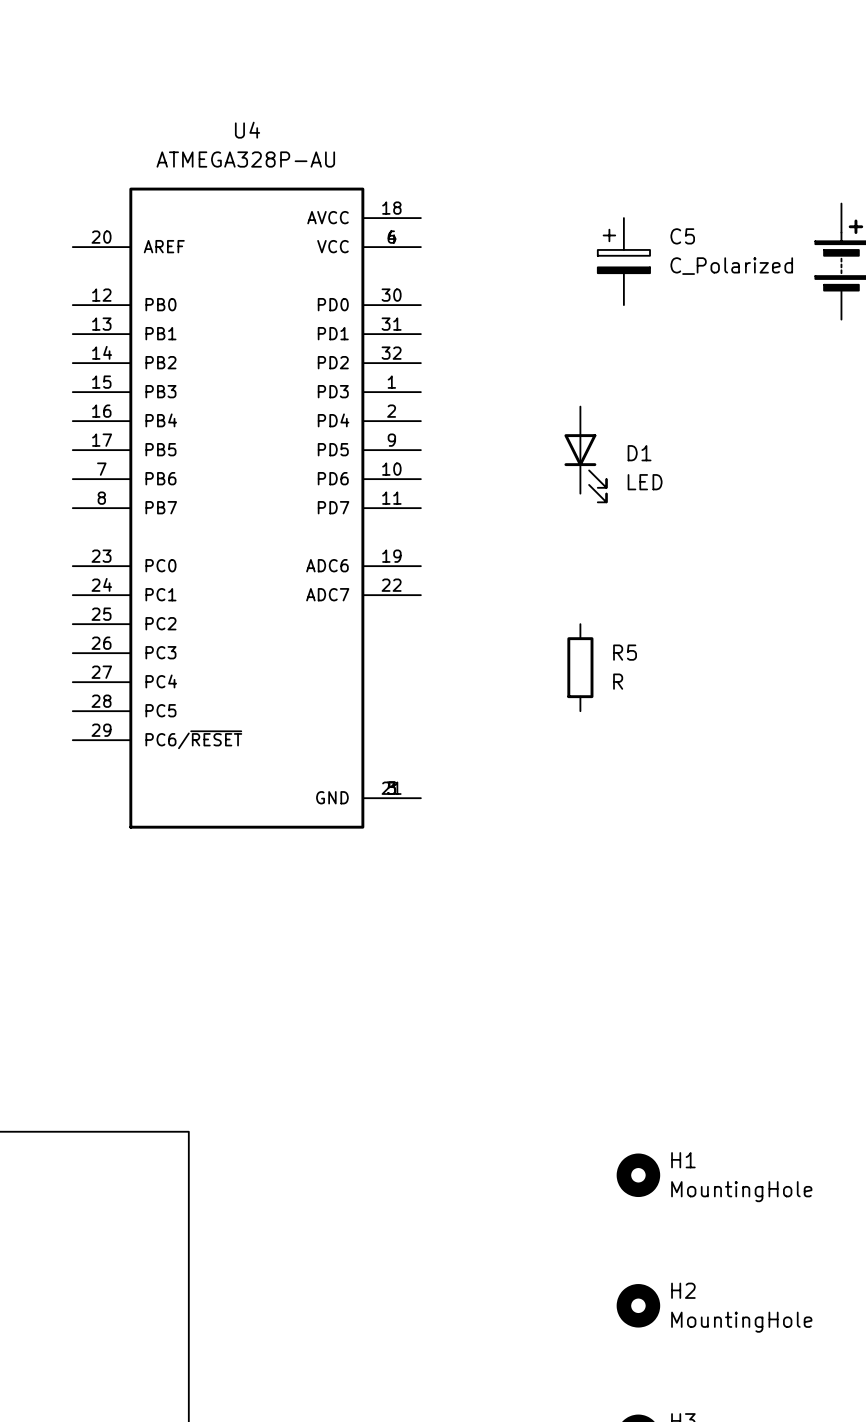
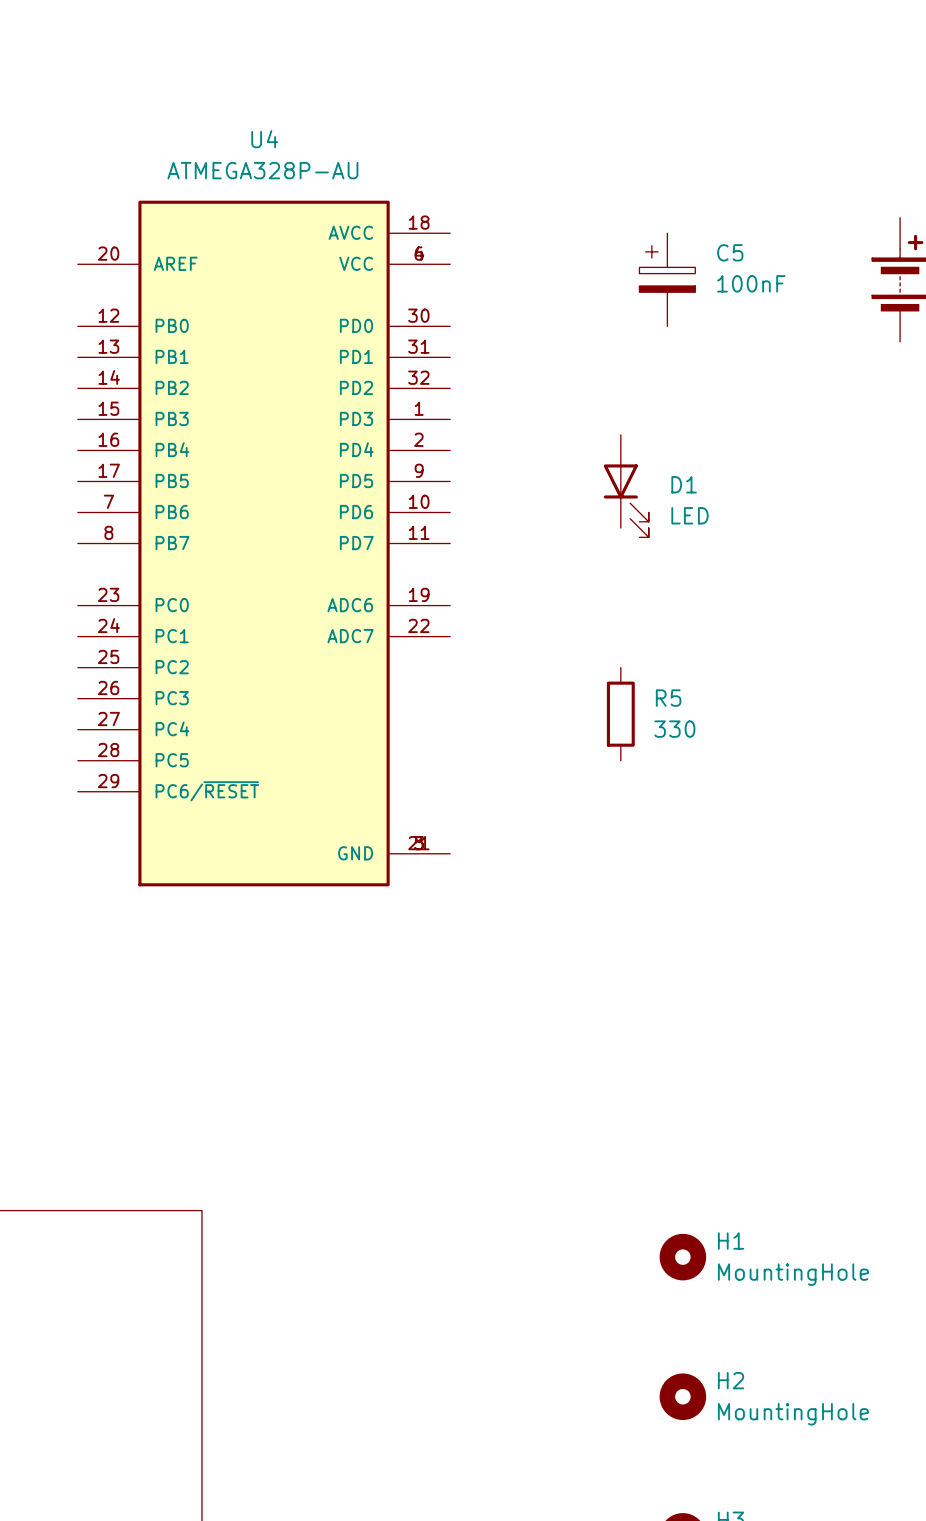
C5 value: C_Polarized (731, 266) -> 100nF (751, 283)
R5 value: R (618, 681) -> 330 (674, 729)

